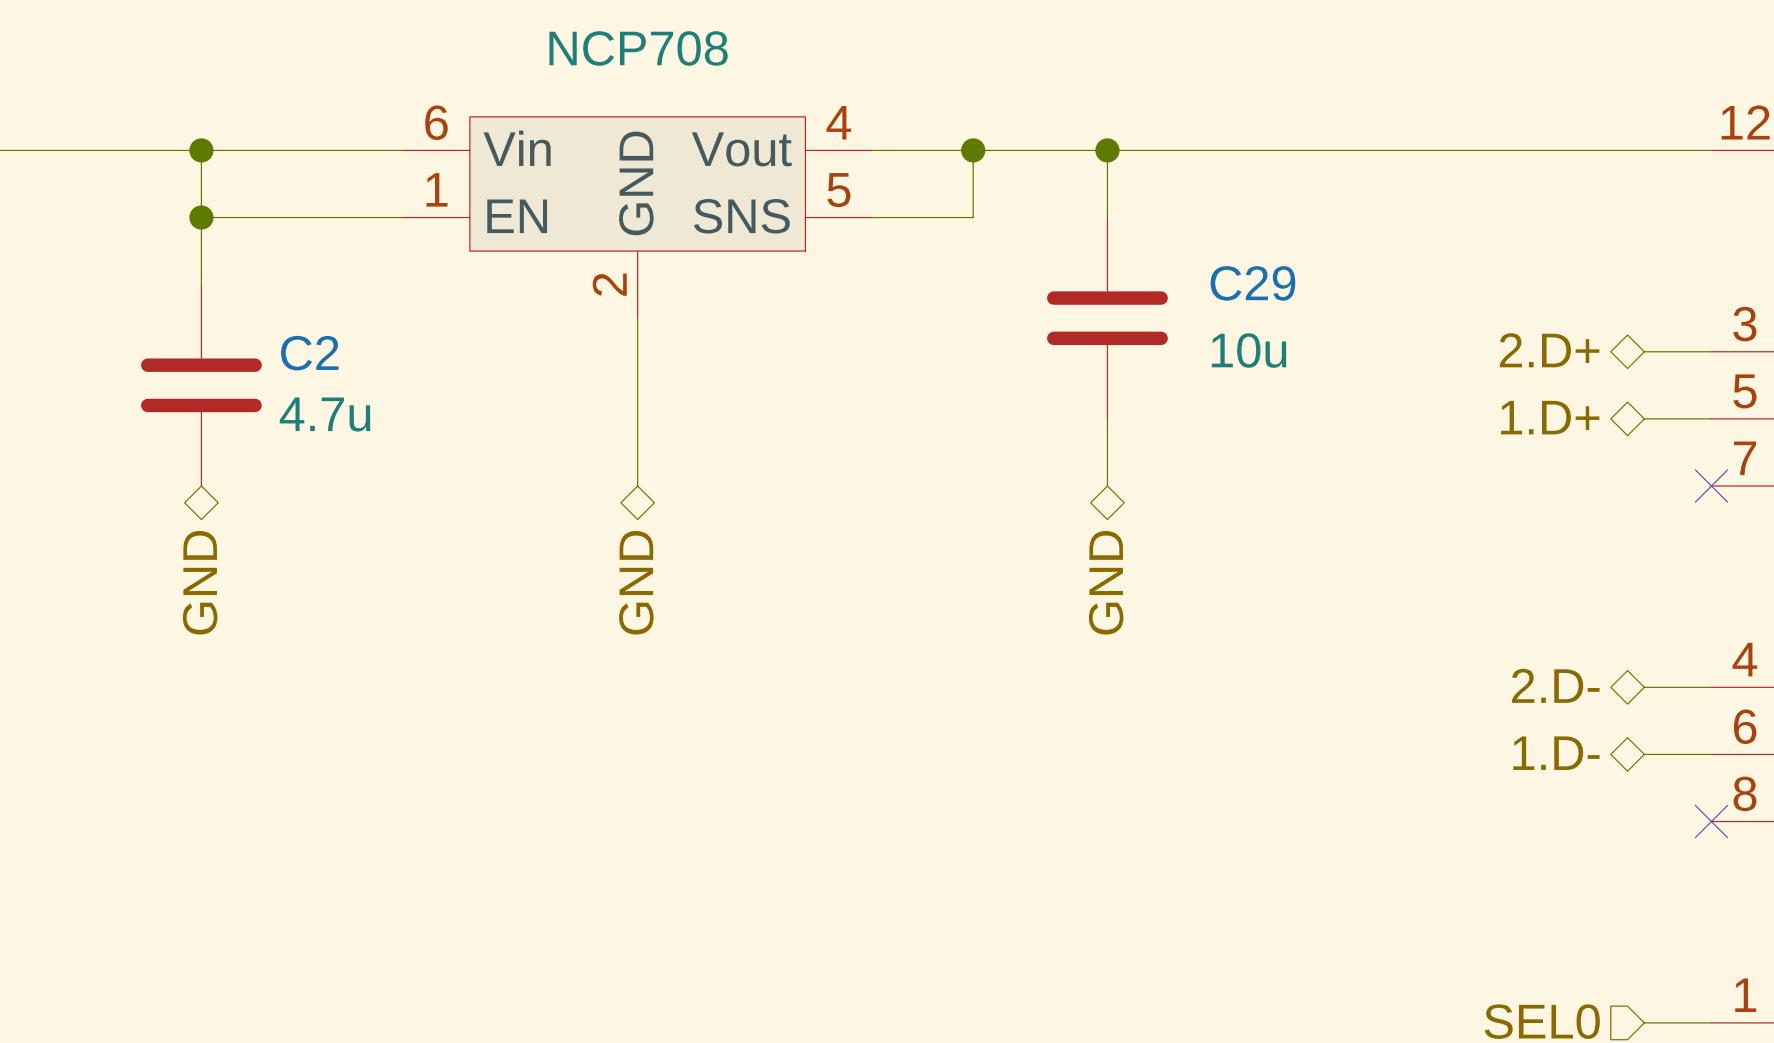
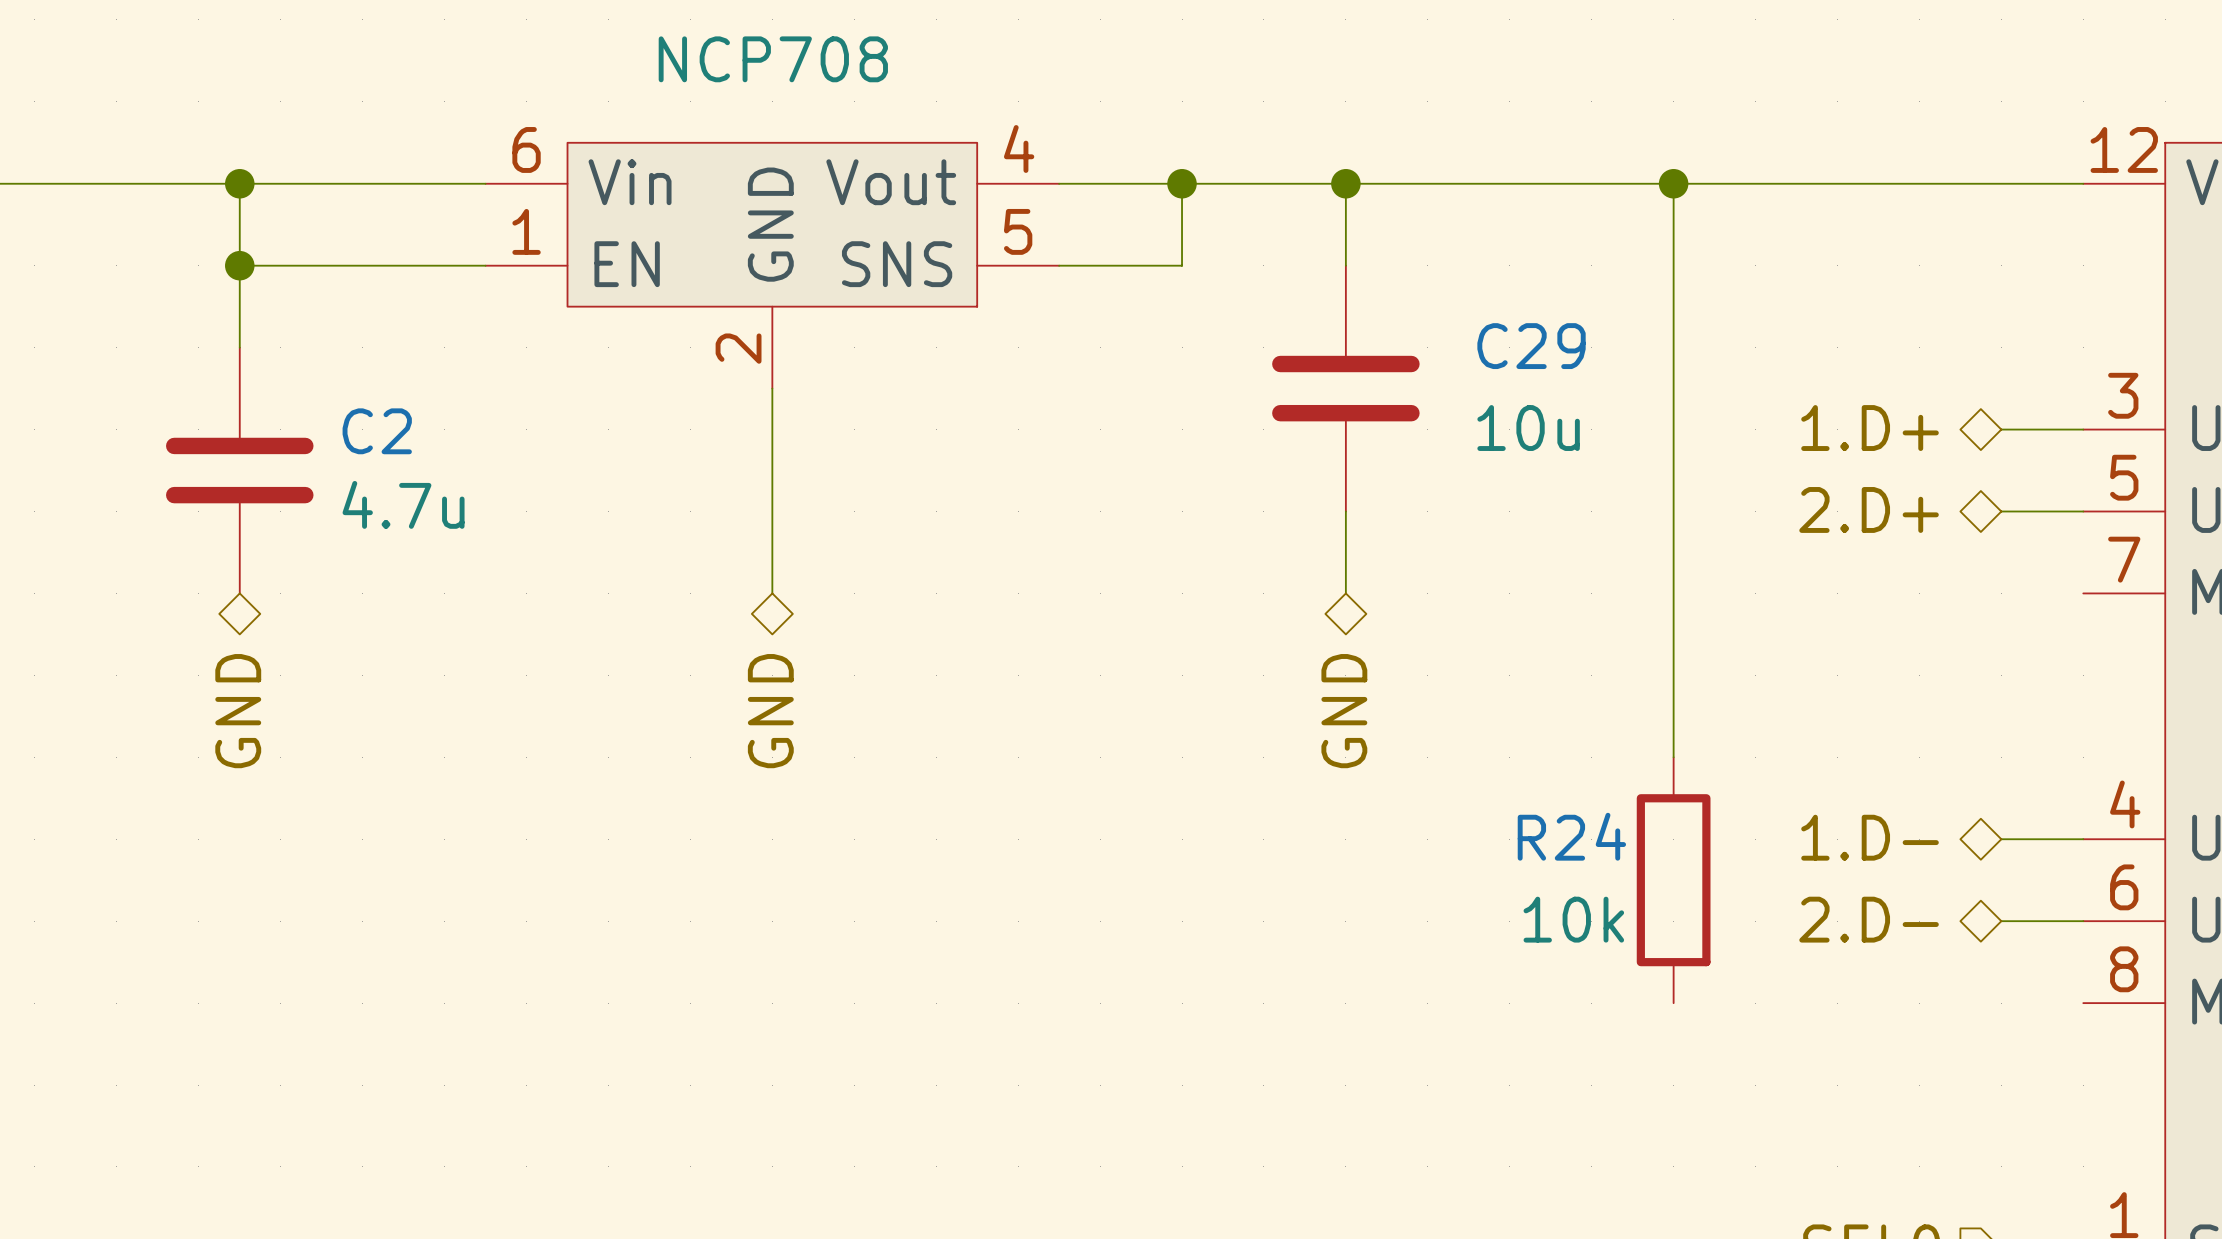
wire: none -> (1673, 183) (1673, 757)
junction: none -> (1673, 183)
hierarchical label: 2.D+ (1549, 350) -> 1.D+ (1870, 428)
hierarchical label: 1.D+ (1550, 417) -> 2.D+ (1869, 509)
no-connect mark: (1711, 485) -> none
hierarchical label: 2.D- (1555, 685) -> 1.D- (1870, 837)
R24: none -> 10k (1673, 880)
hierarchical label: 1.D- (1556, 753) -> 2.D- (1869, 919)
no-connect mark: (1711, 821) -> none

